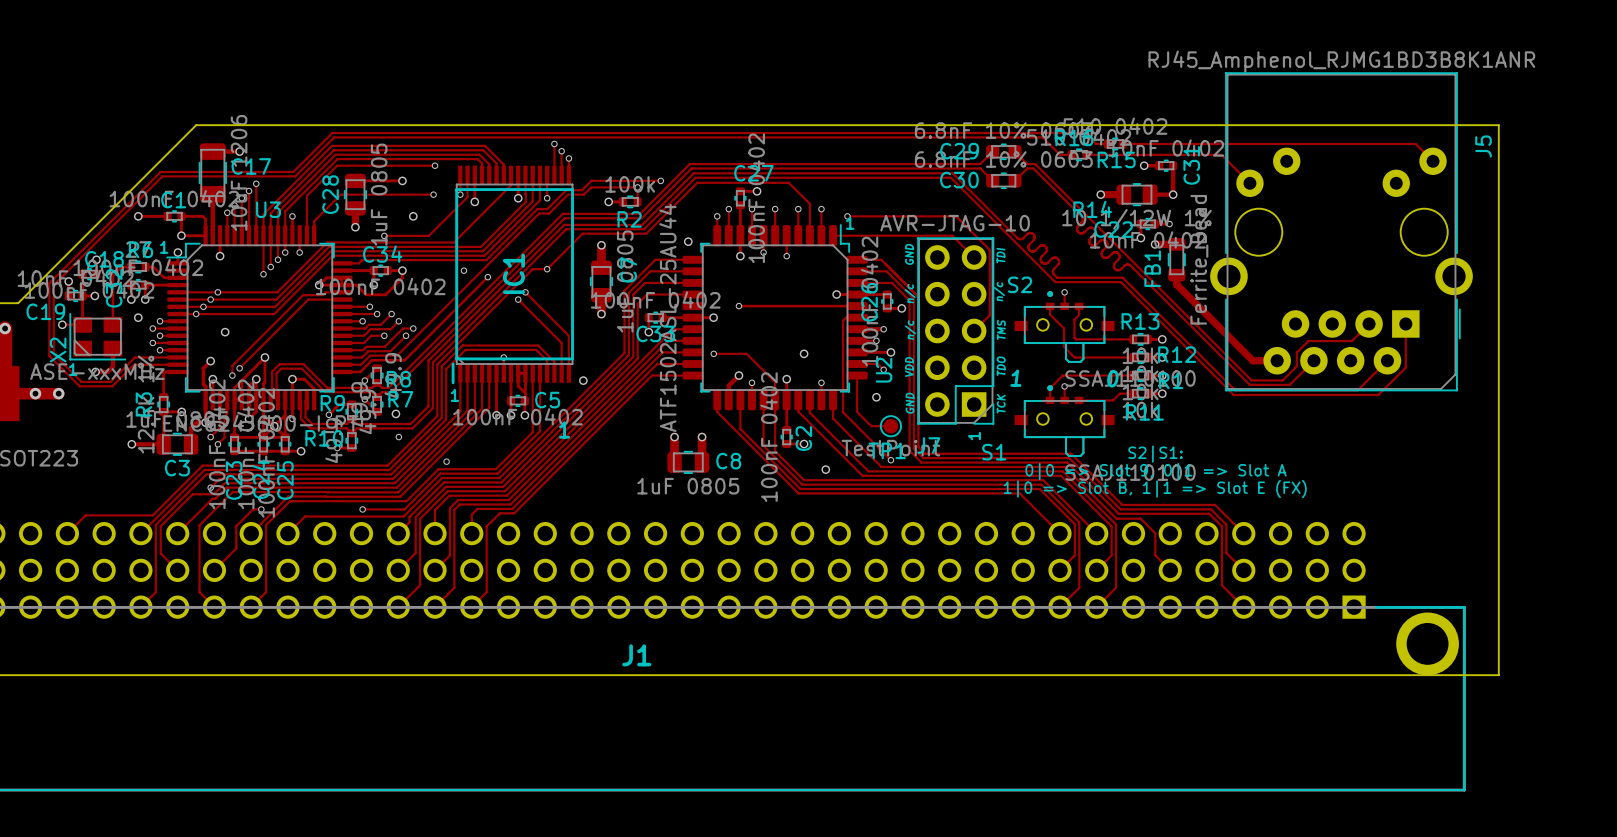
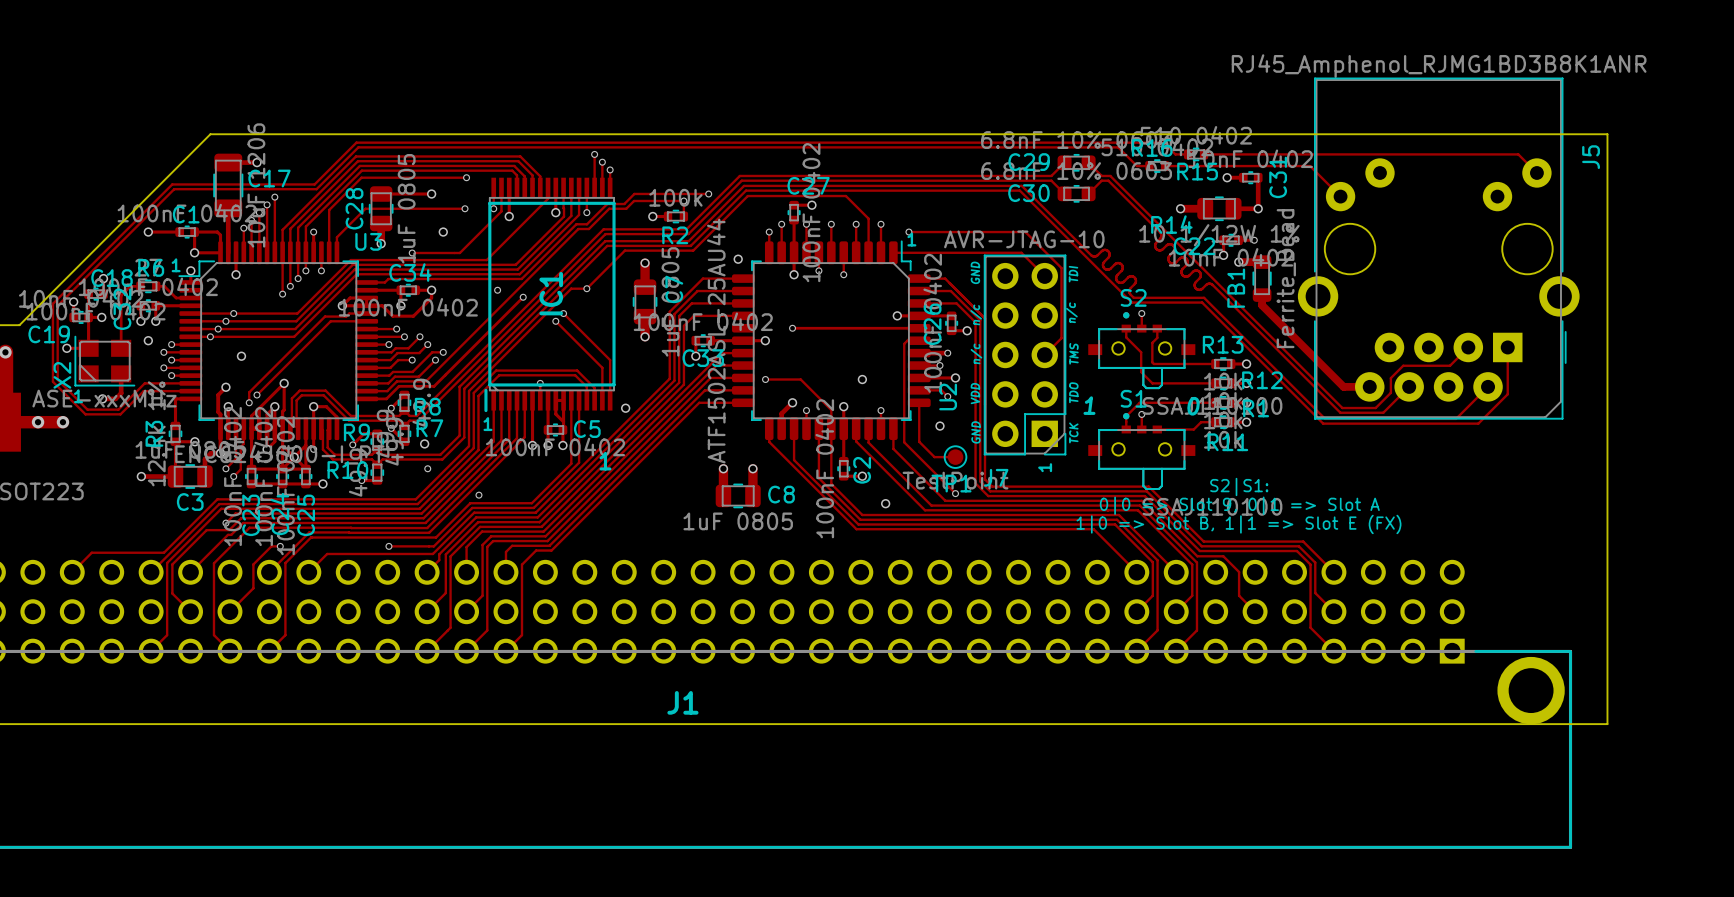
U3 name position: U3 (268, 209) -> U3 (368, 241)
S2 name position: S2 (1020, 284) -> S2 (1133, 297)
S1 name position: S1 (994, 452) -> S1 (1133, 398)

